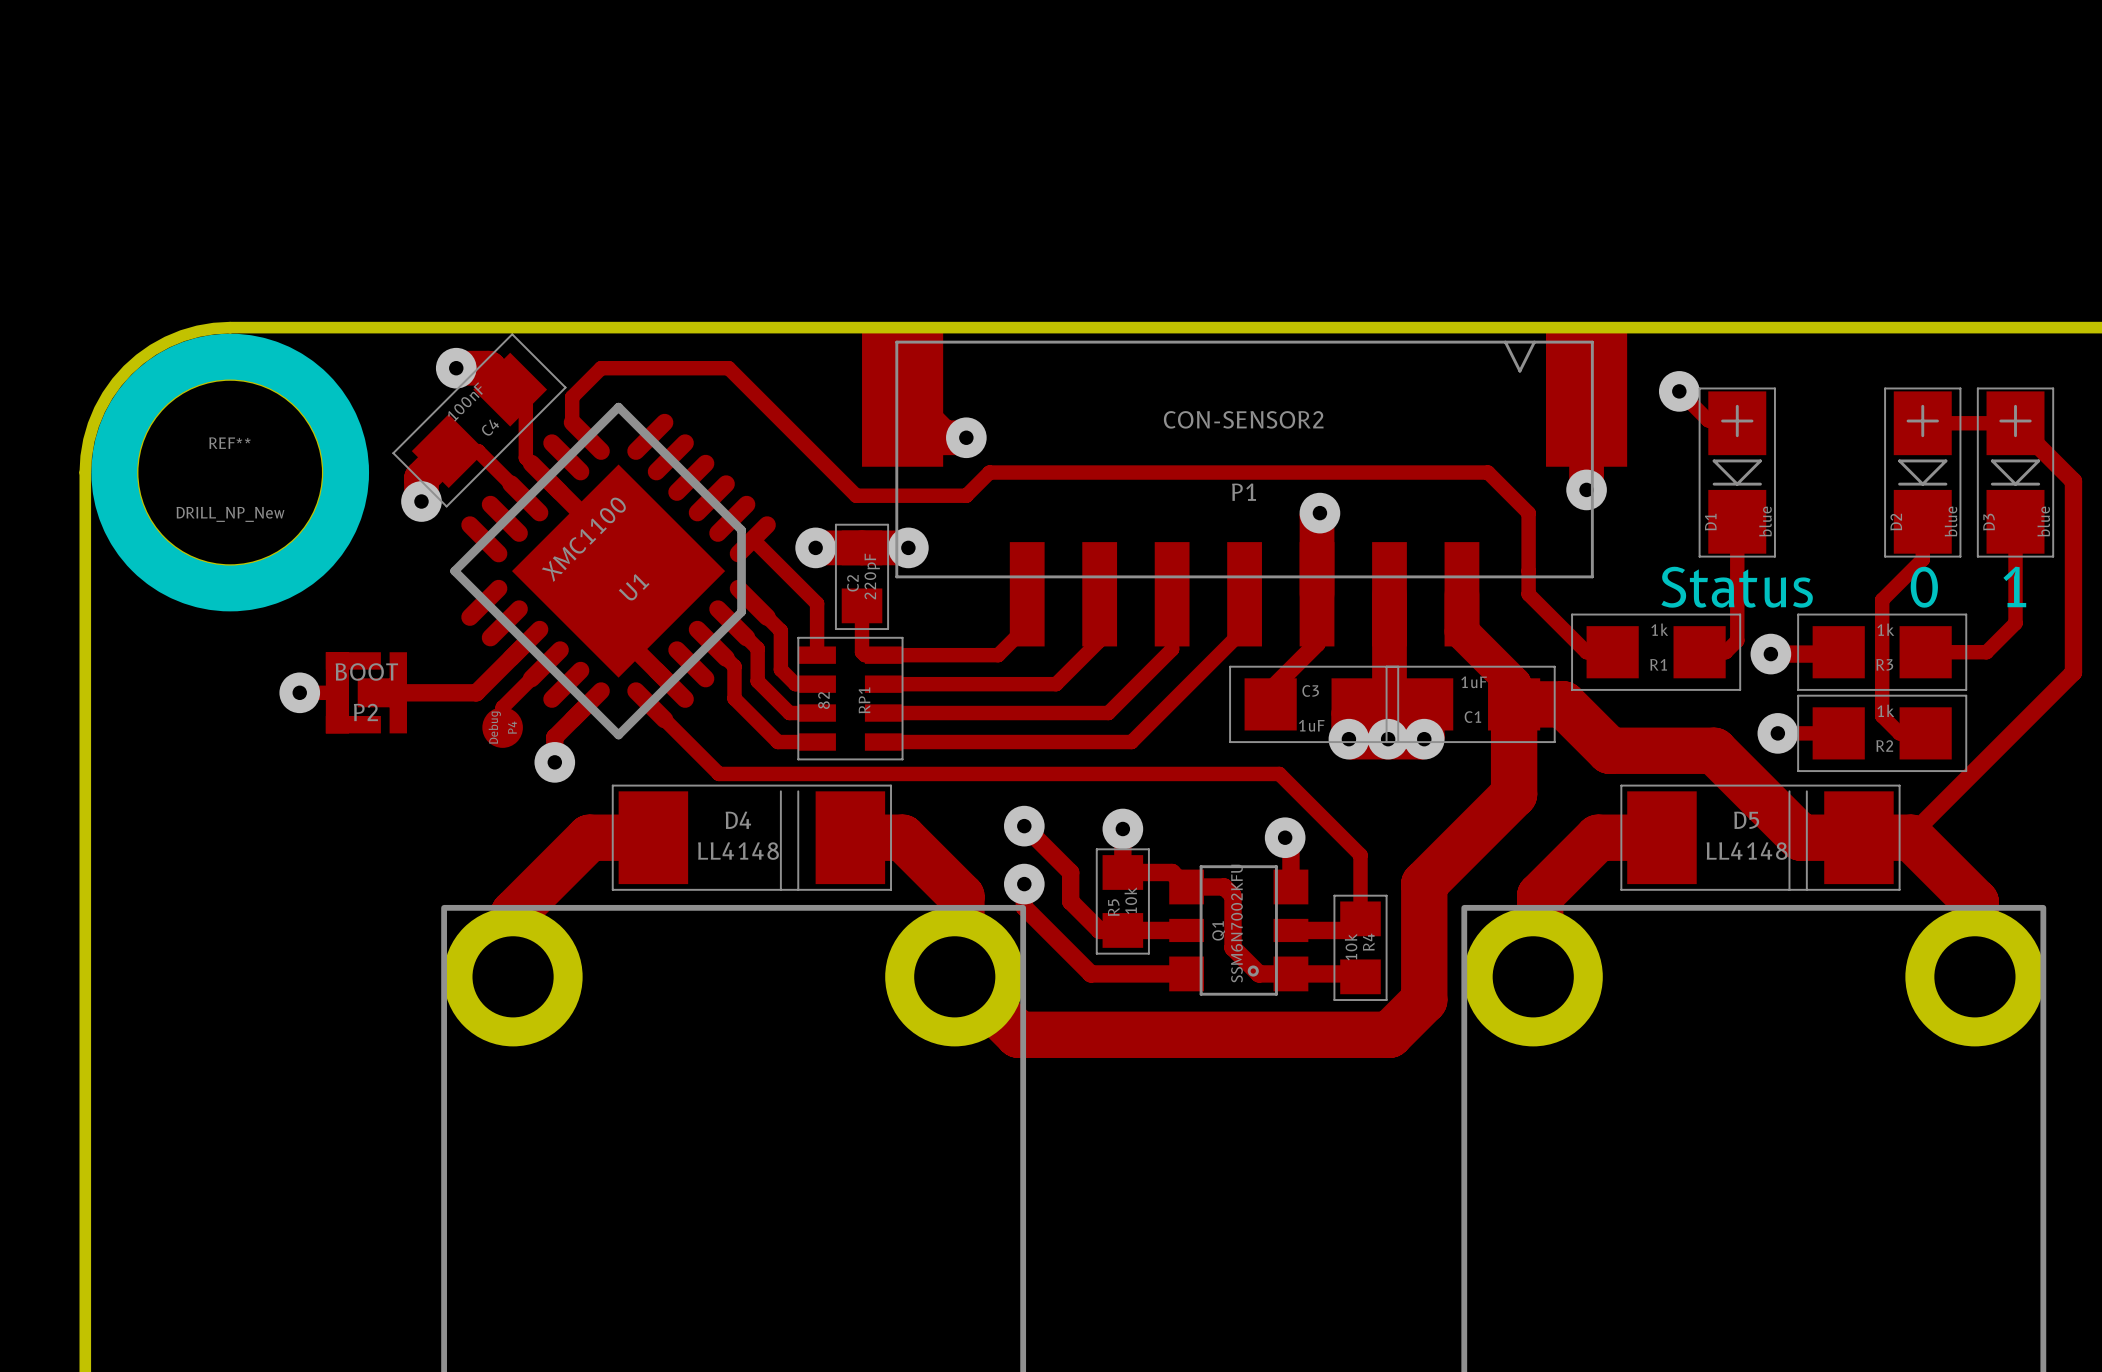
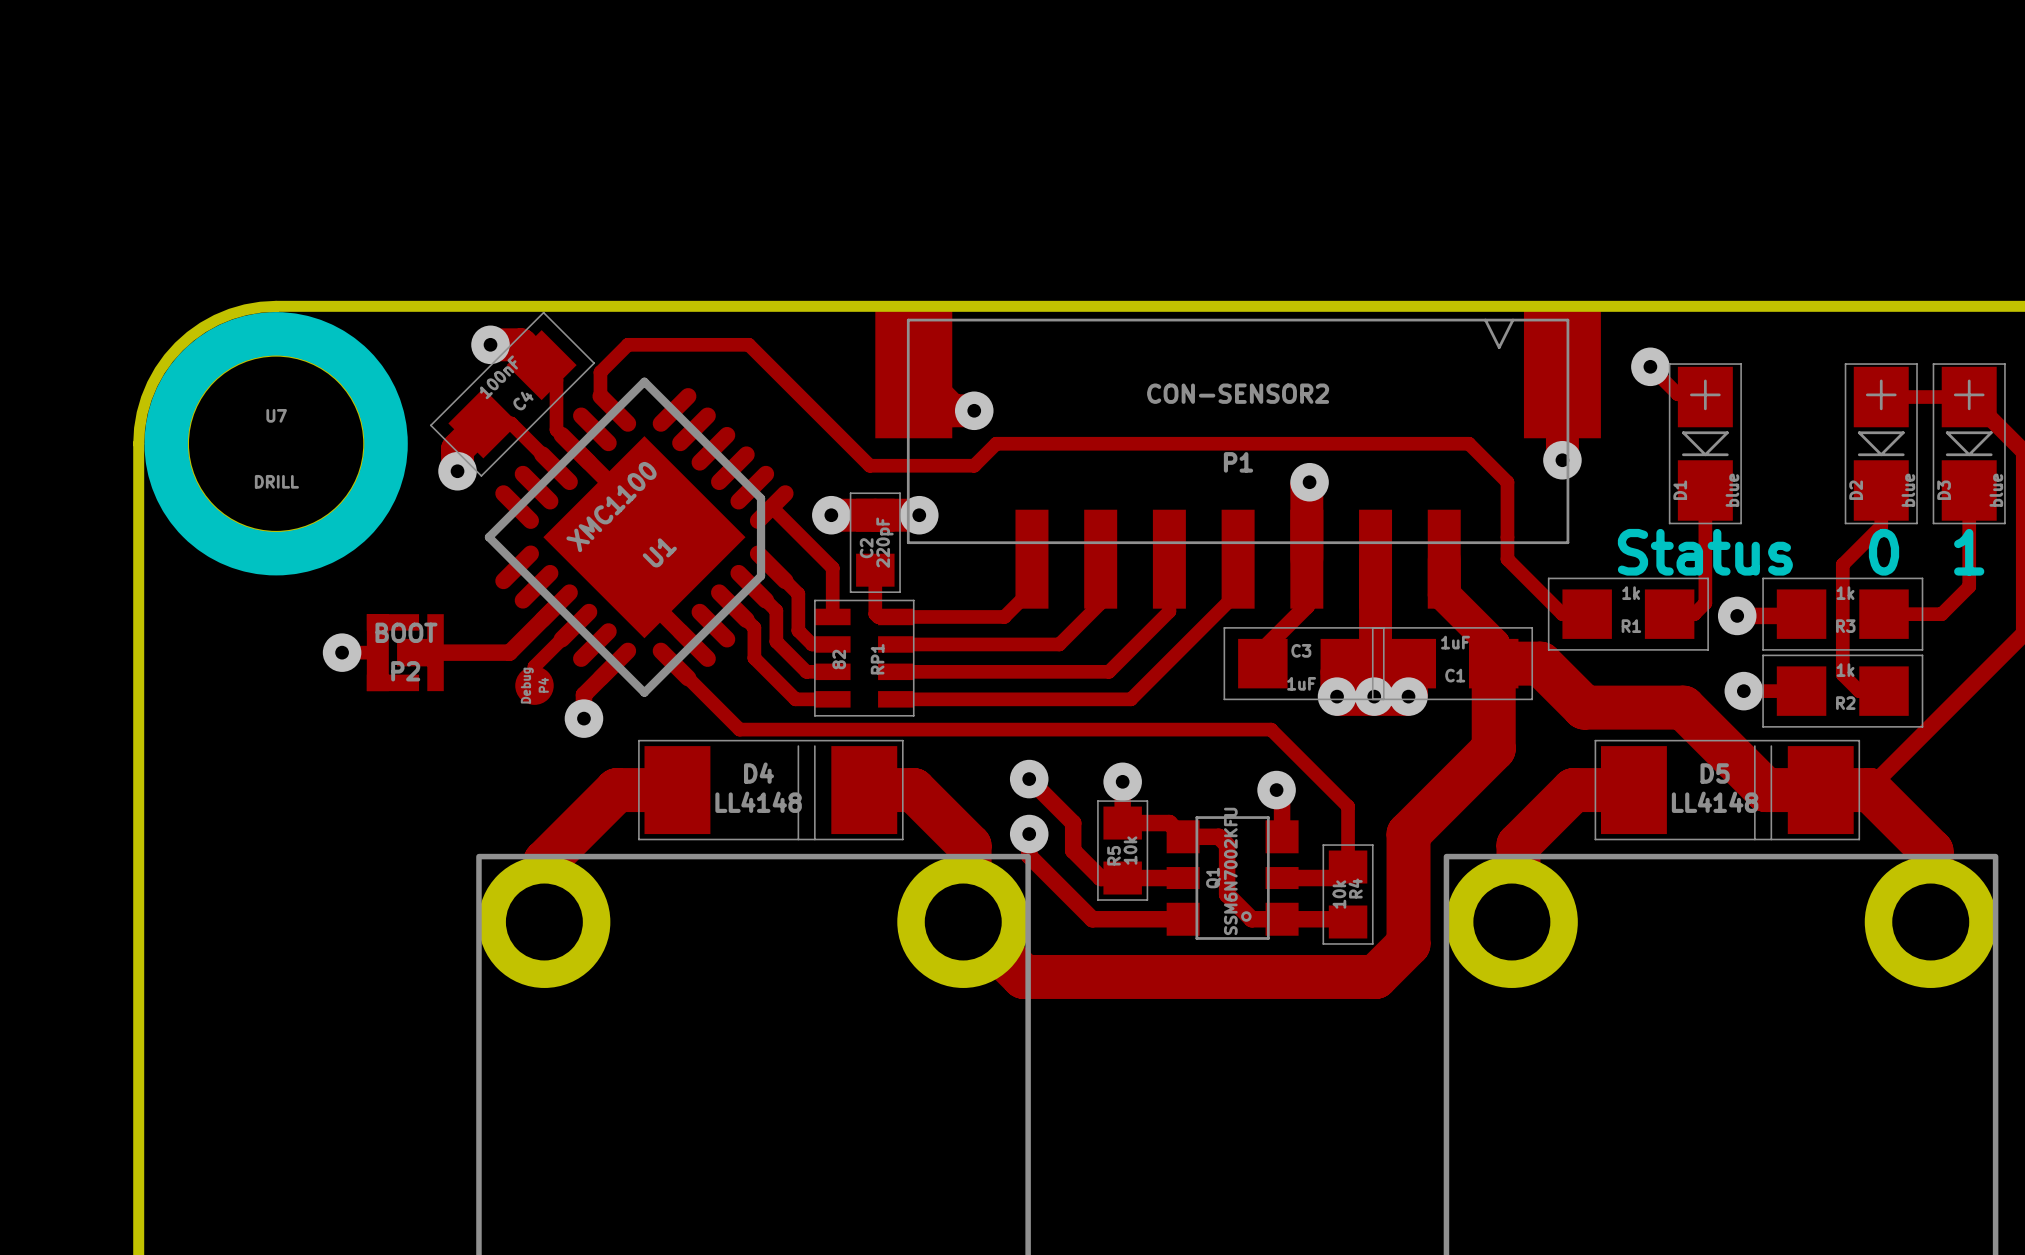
REF** name: REF** (229, 443) -> U7 (276, 415)
REF** value: DRILL_NP_New (230, 514) -> DRILL (276, 481)

